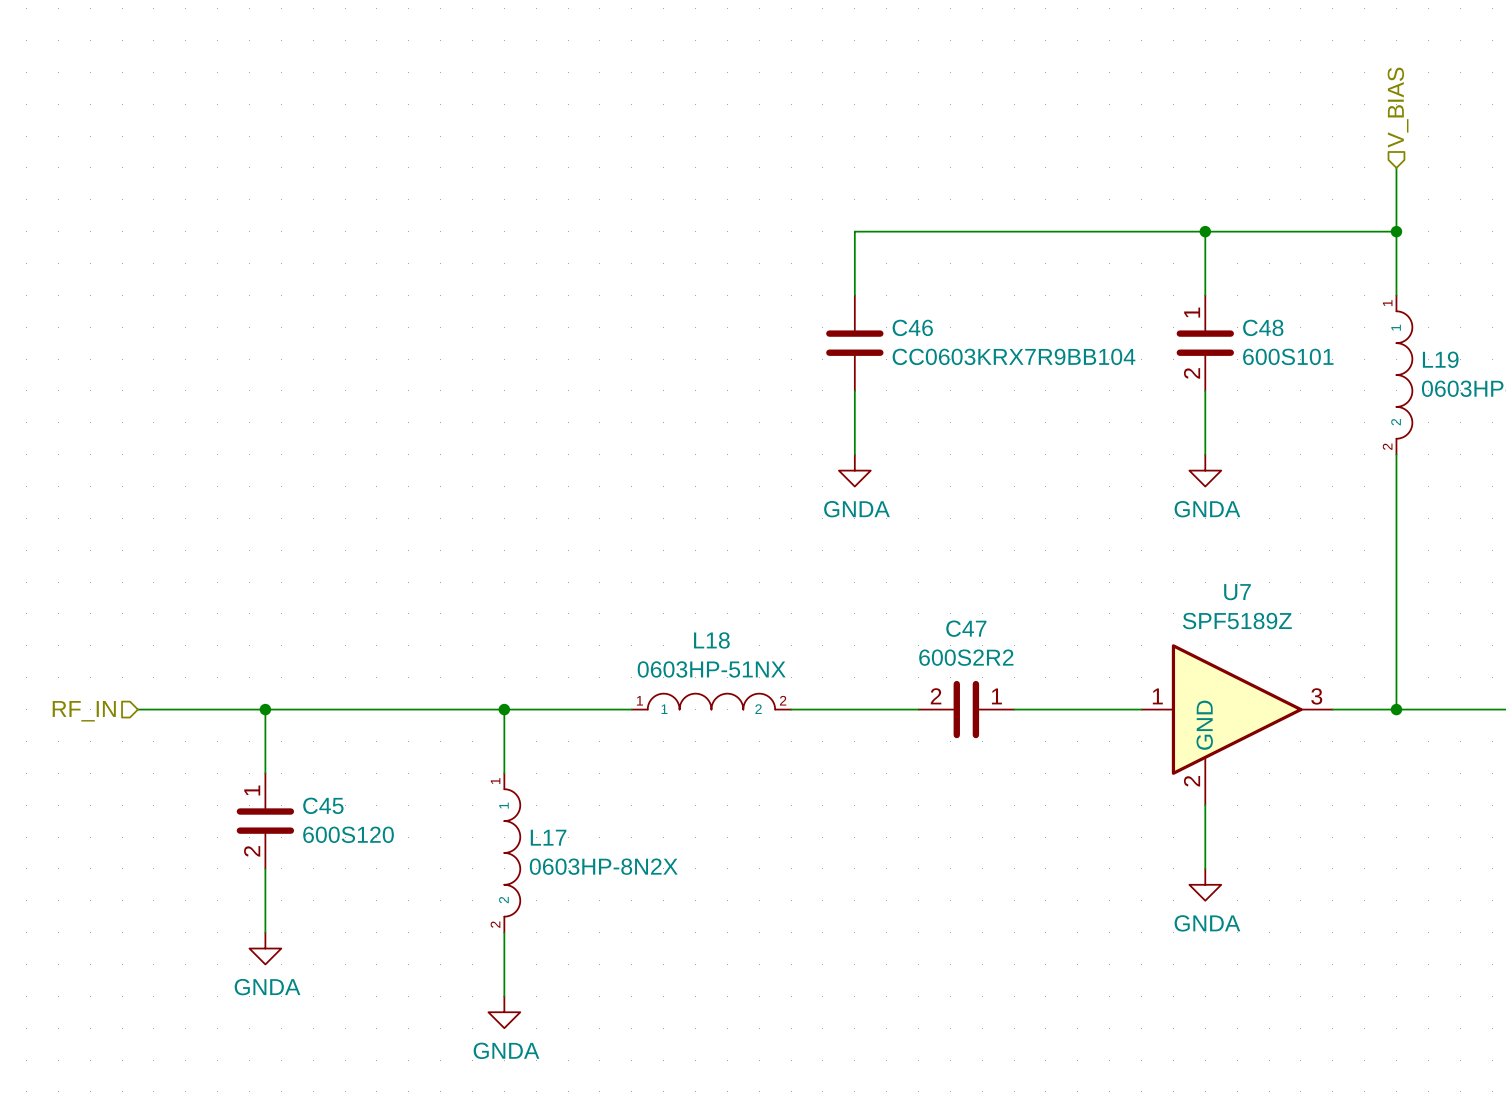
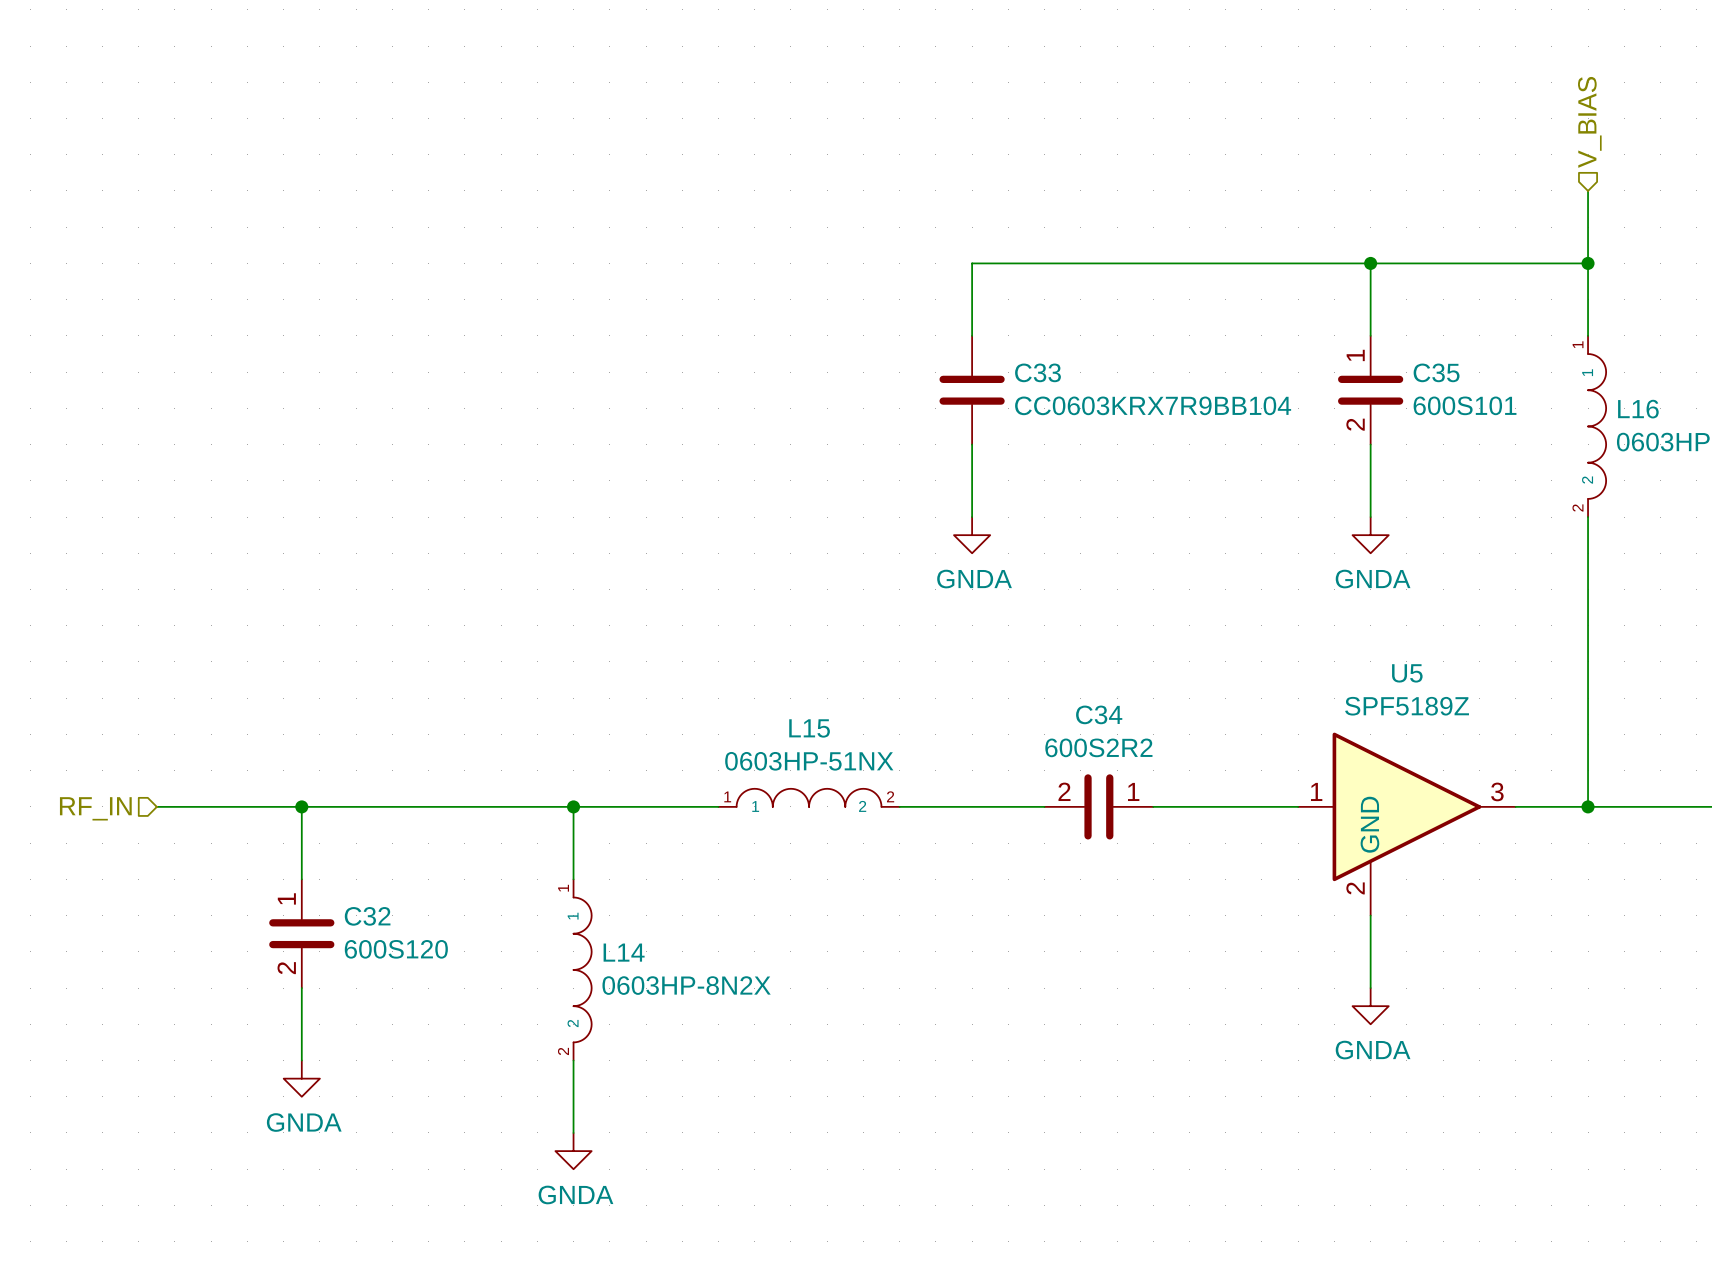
C46 name: C46 (912, 327) -> C33 (1037, 372)
C48 name: C48 (1263, 327) -> C35 (1436, 372)
L19 name: L19 (1440, 359) -> L16 (1638, 409)
U7 name: U7 (1237, 592) -> U5 (1407, 673)
C47 name: C47 (966, 628) -> C34 (1099, 714)
L18 name: L18 (711, 640) -> L15 (809, 728)
C45 name: C45 (323, 805) -> C32 (367, 916)
L17 name: L17 (548, 837) -> L14 (624, 952)

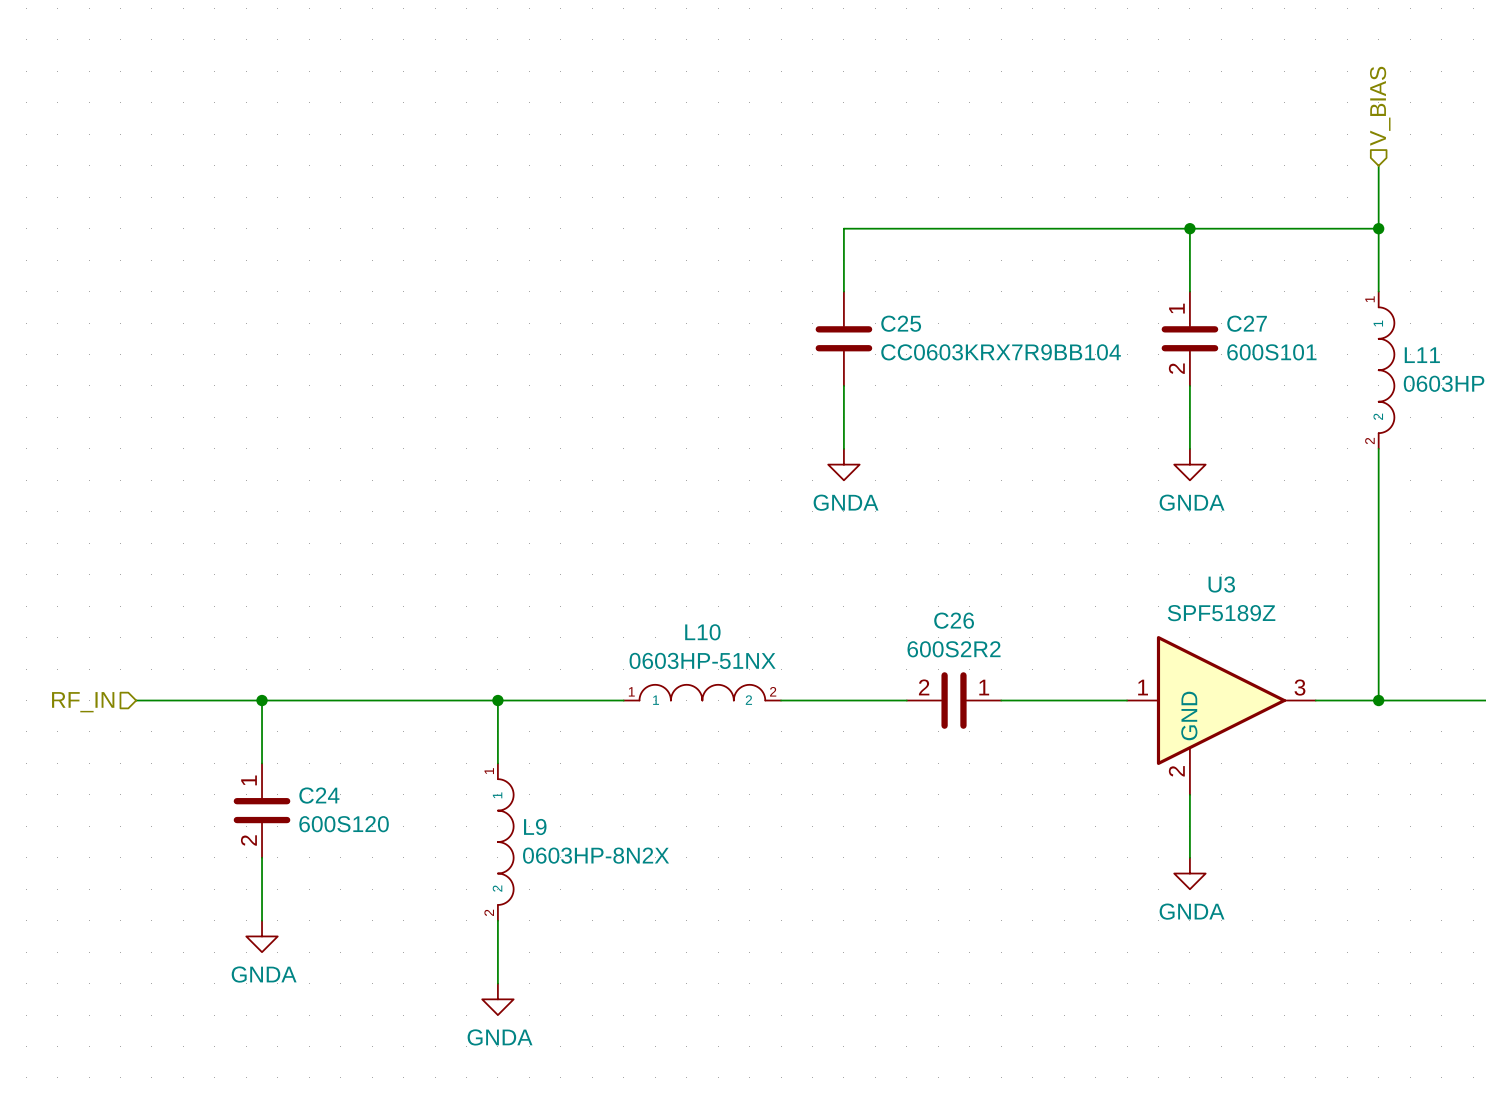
C33 name: C33 (1037, 372) -> C25 (901, 323)
C35 name: C35 (1436, 372) -> C27 (1247, 323)
L16 name: L16 (1638, 409) -> L11 (1422, 355)
U5 name: U5 (1407, 673) -> U3 (1221, 584)
C34 name: C34 (1099, 714) -> C26 (954, 620)
L15 name: L15 (809, 728) -> L10 (702, 632)
C32 name: C32 (367, 916) -> C24 (319, 795)
L14 name: L14 (624, 952) -> L9 (535, 827)

